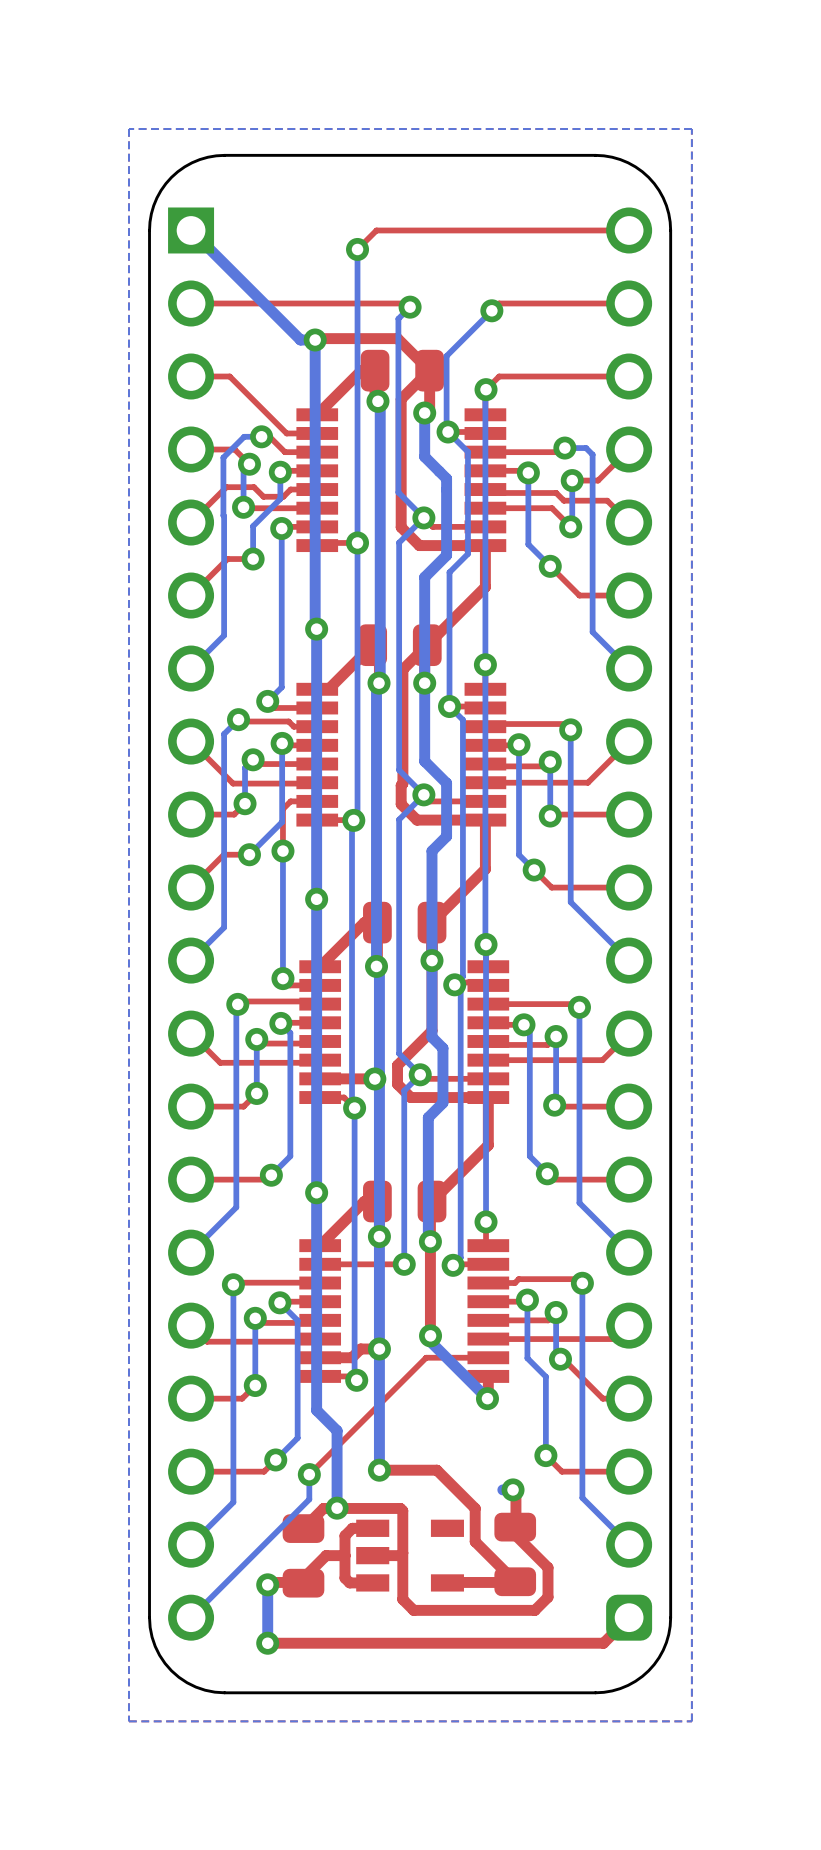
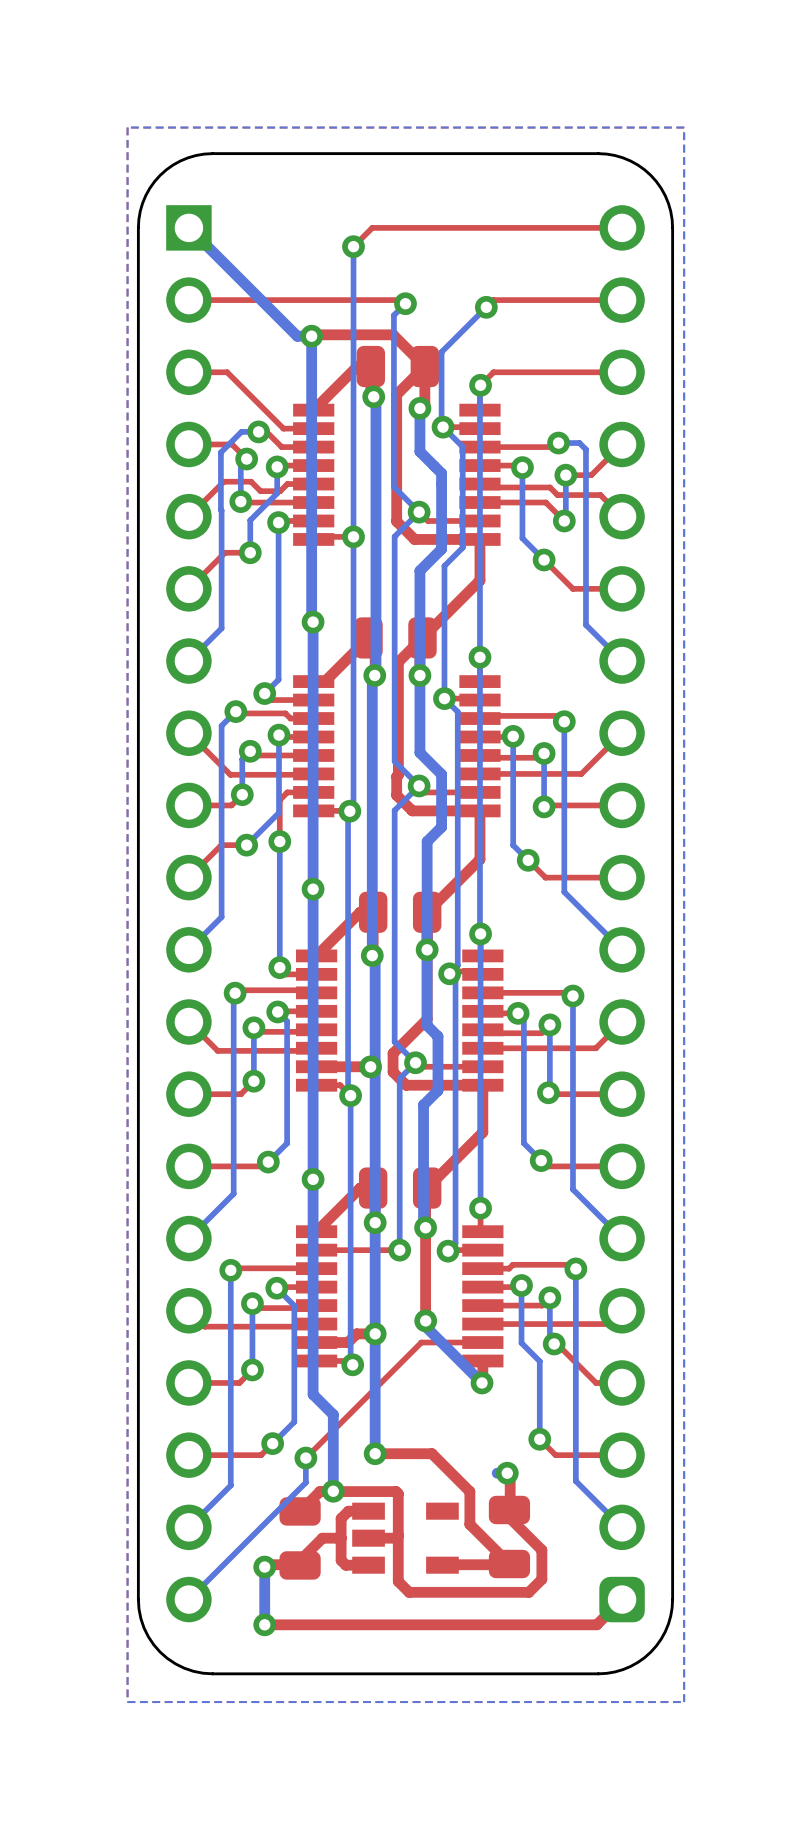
part footprint: [148, 153, 673, 1695] -> [136, 152, 675, 1676]

